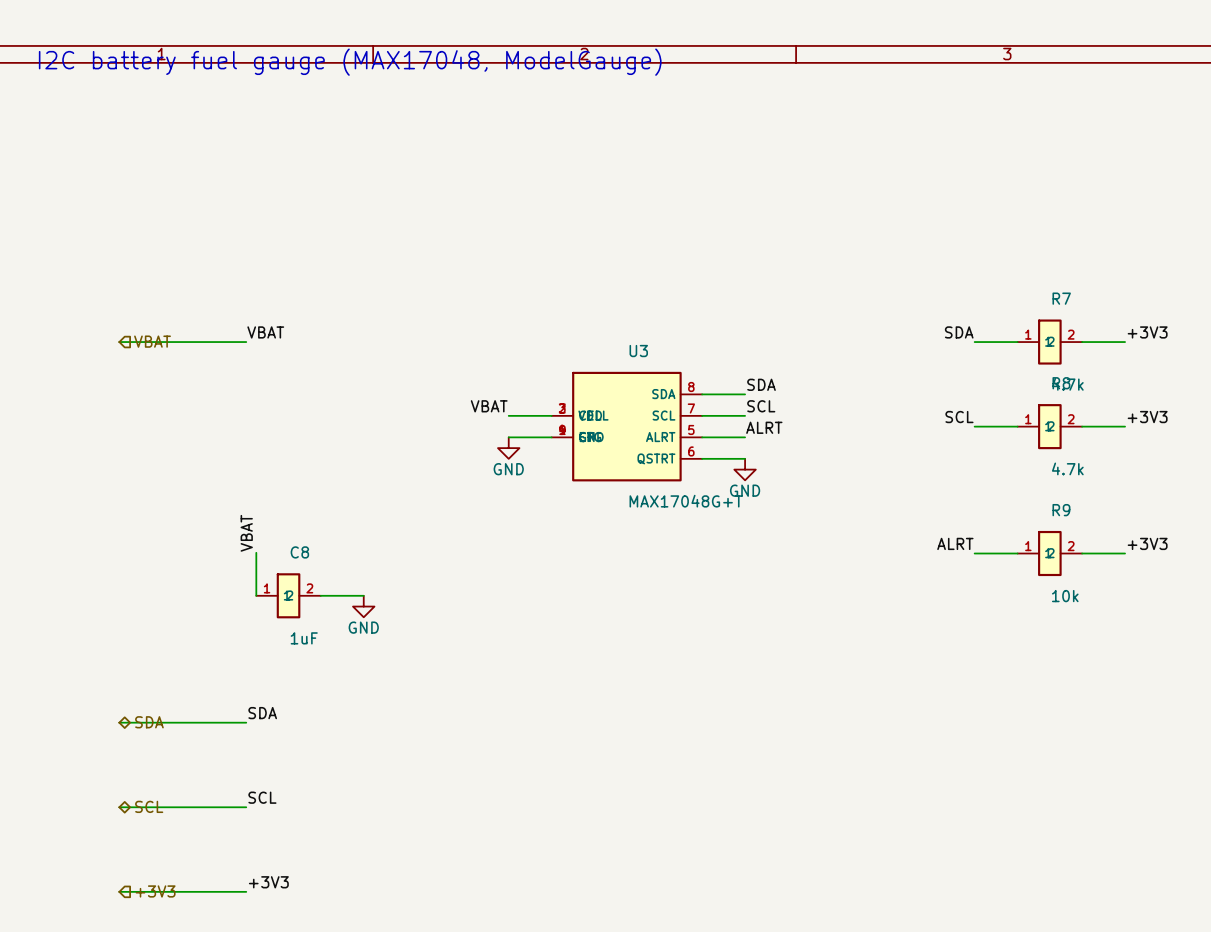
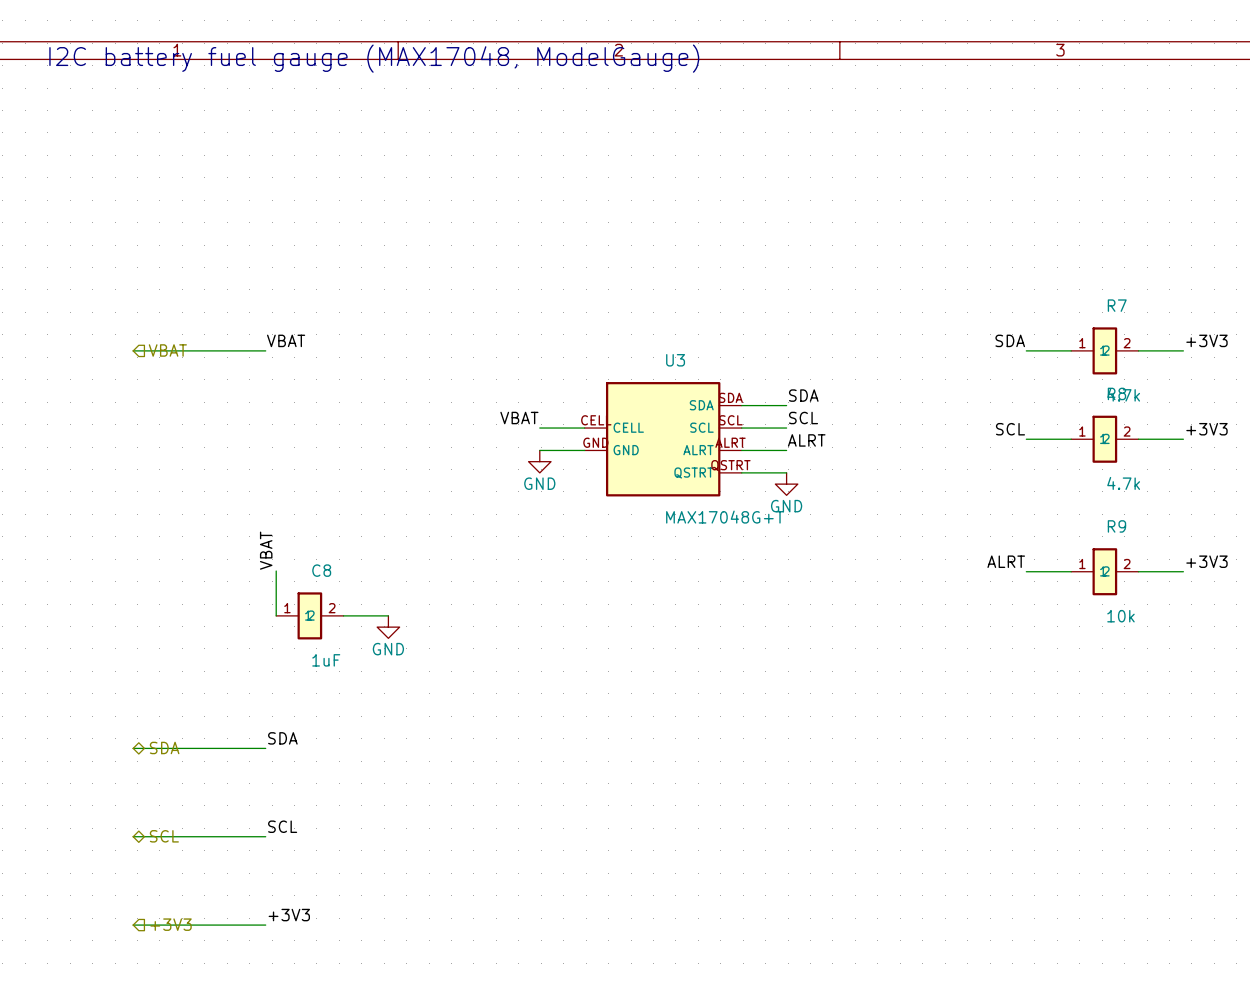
U3 symbol: [551, 371, 703, 482] -> [584, 382, 742, 497]

